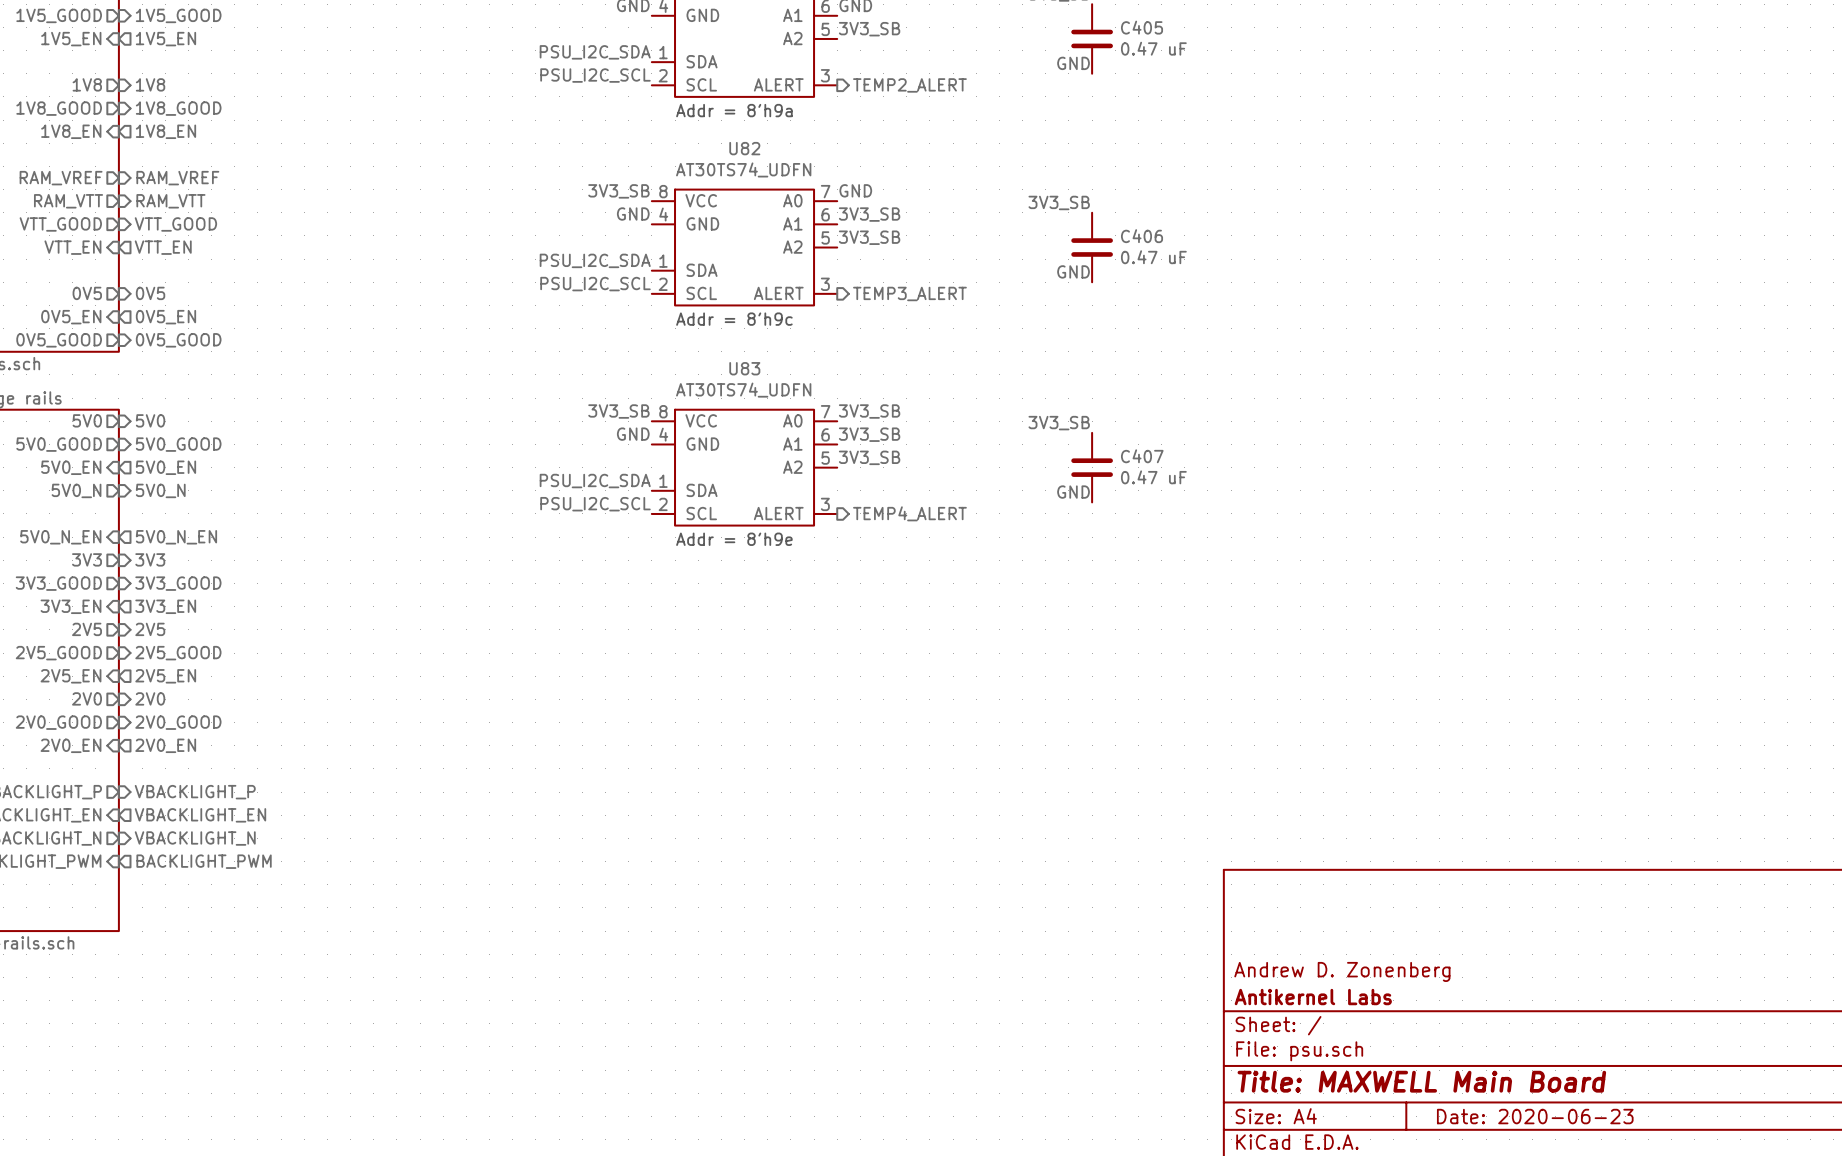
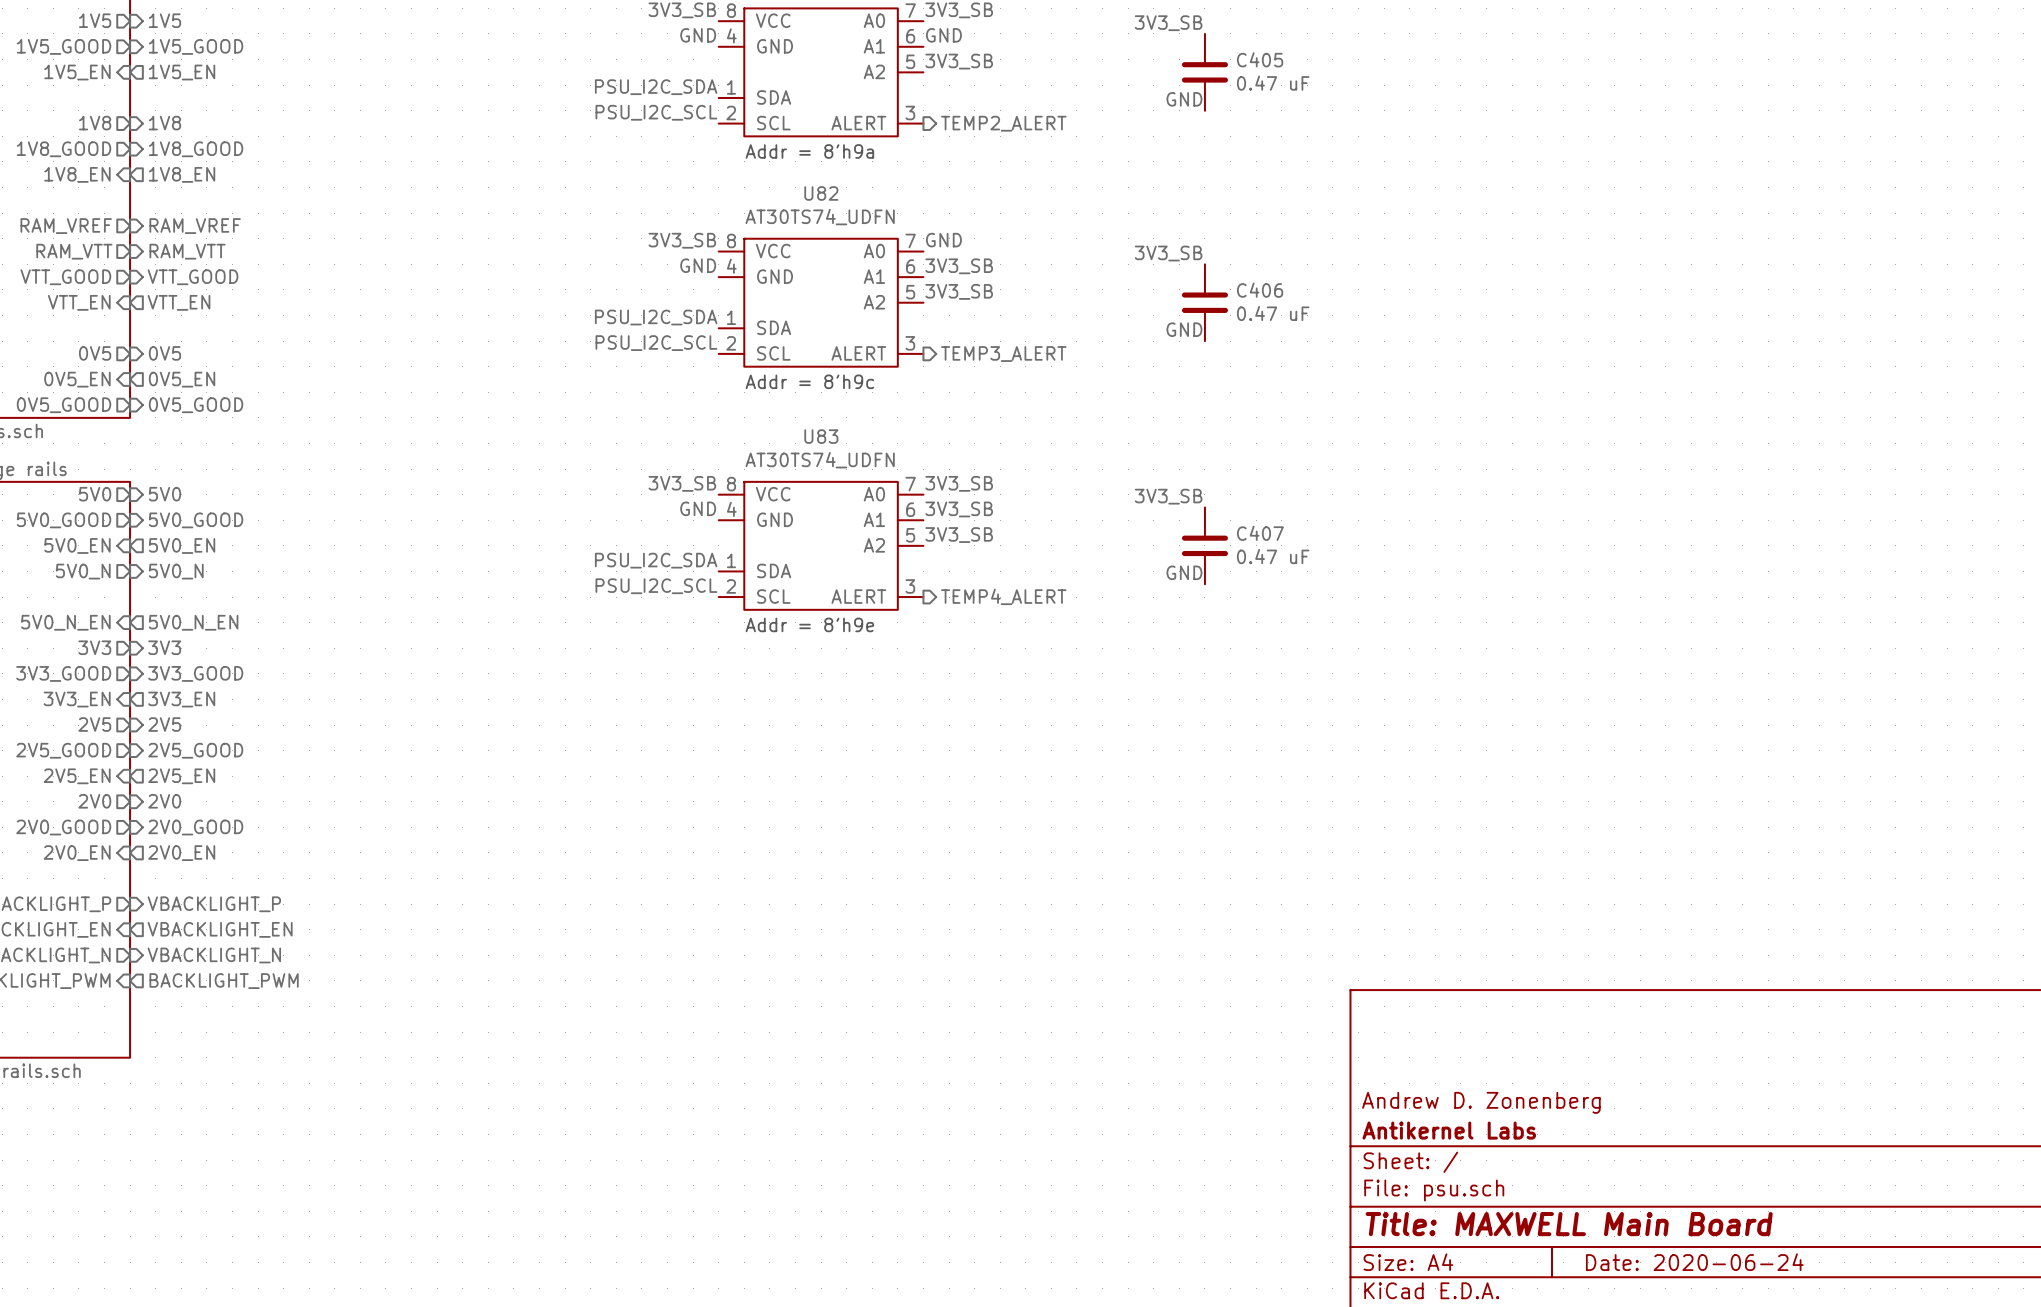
title block: Date: 2020-06-23 (1535, 1116) -> Date: 2020-06-24 (1694, 1262)

